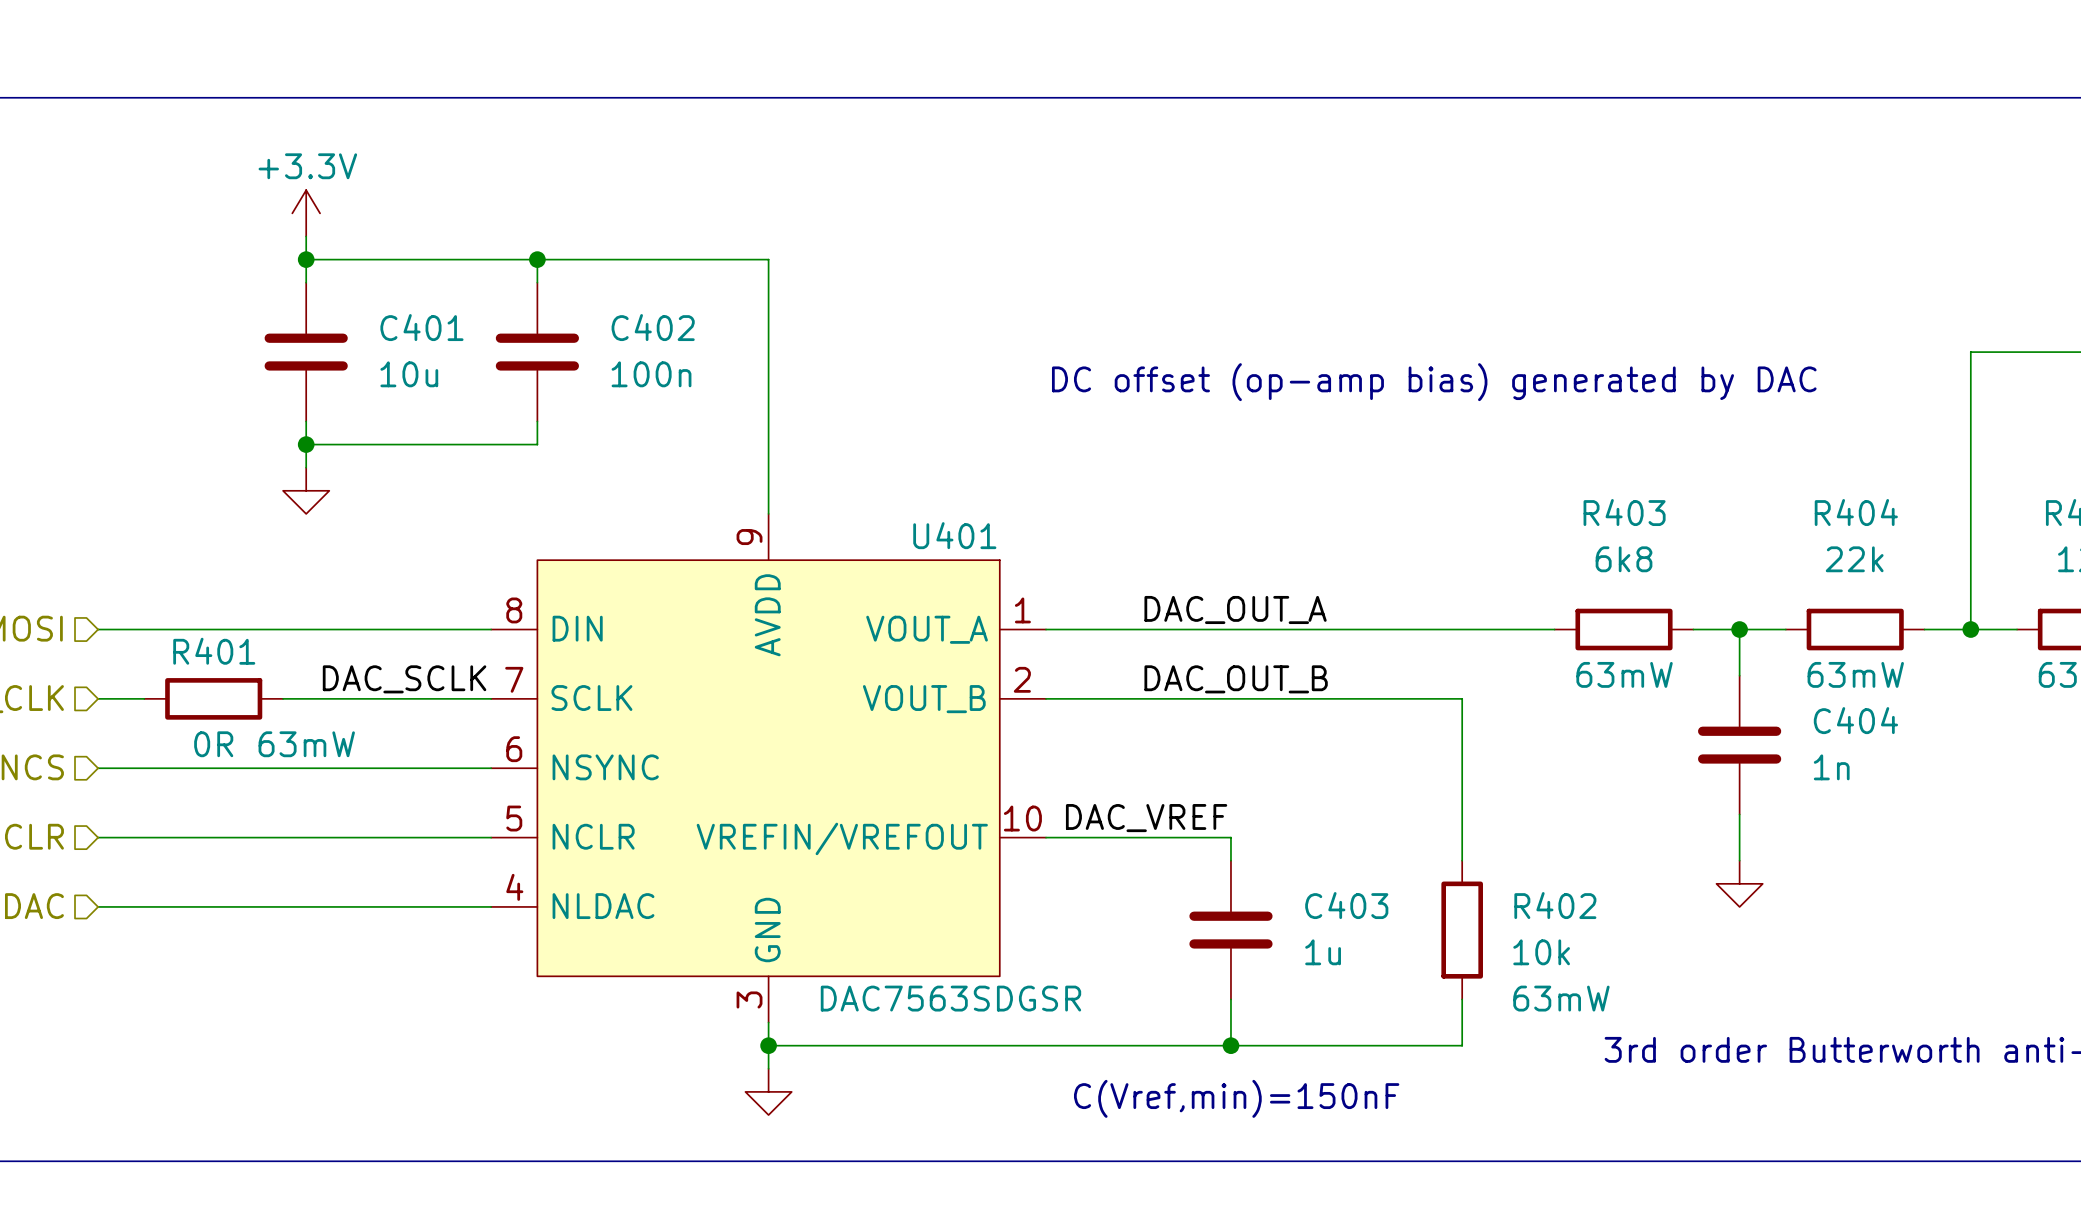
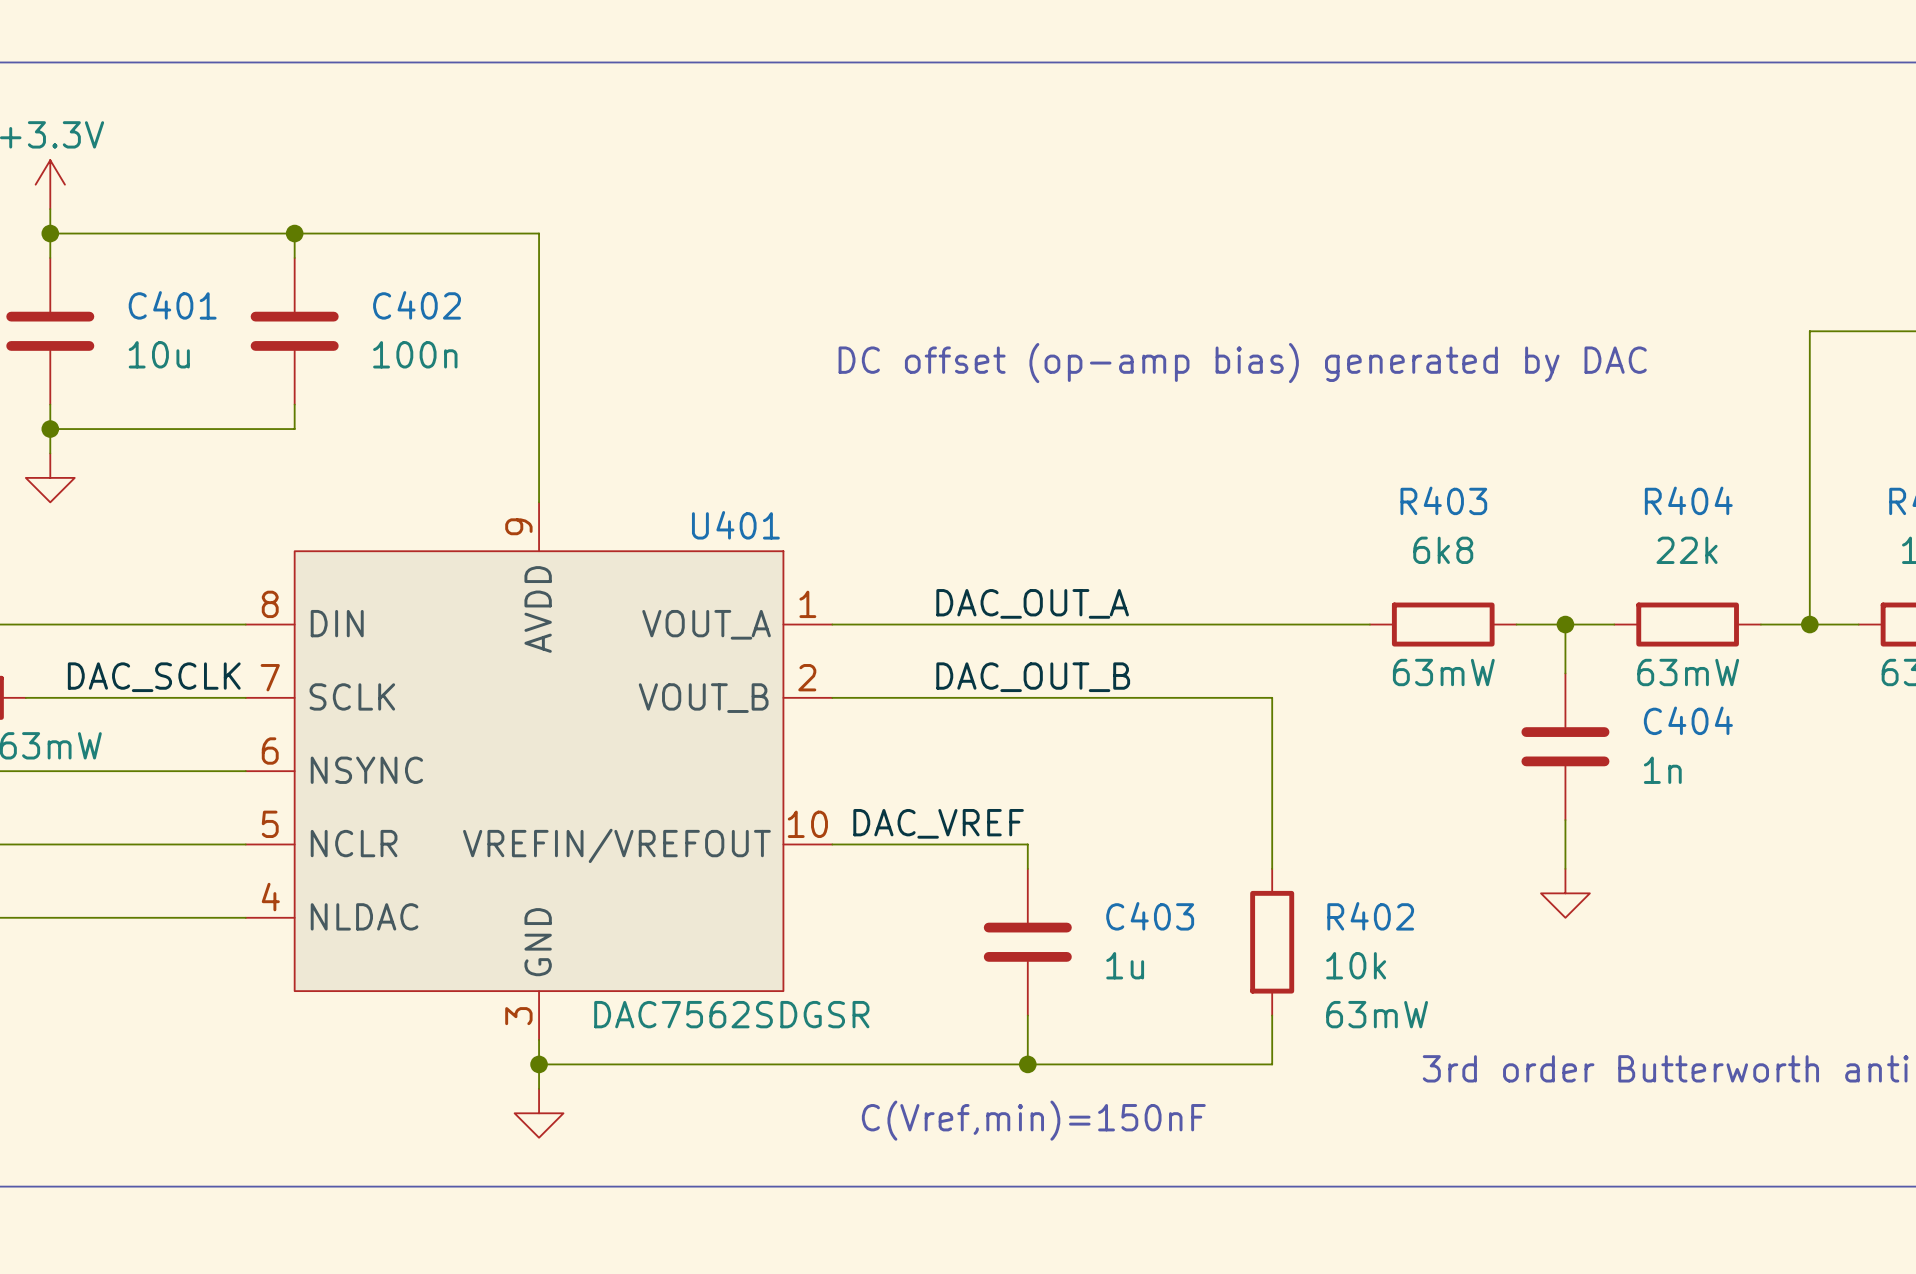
U401 value: DAC7563SDGSR (950, 998) -> DAC7562SDGSR (731, 1014)

